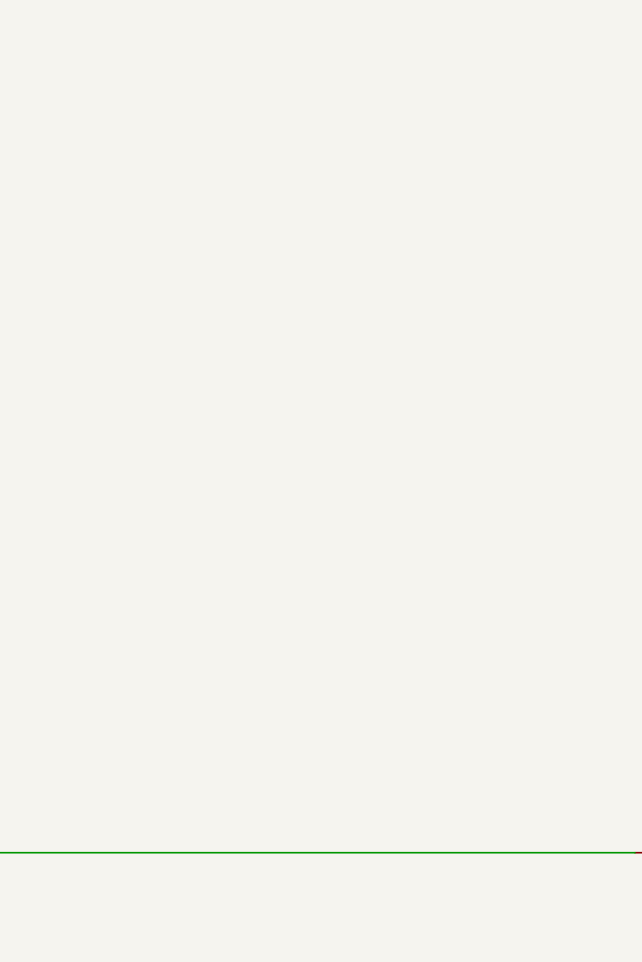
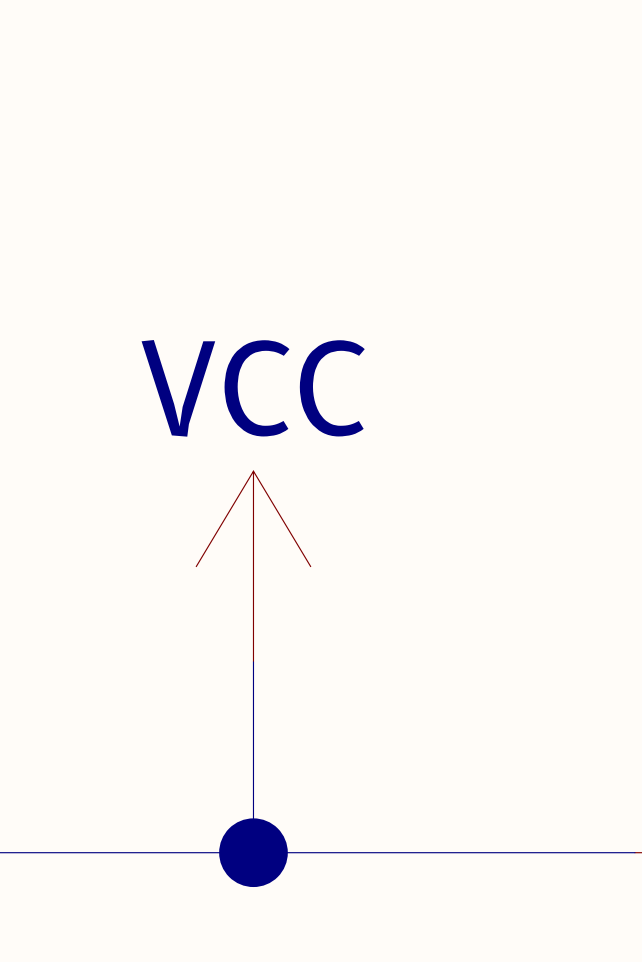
power symbol: none -> VCC (253, 566)
wire: none -> (253, 661) (253, 852)
junction: none -> (253, 852)

